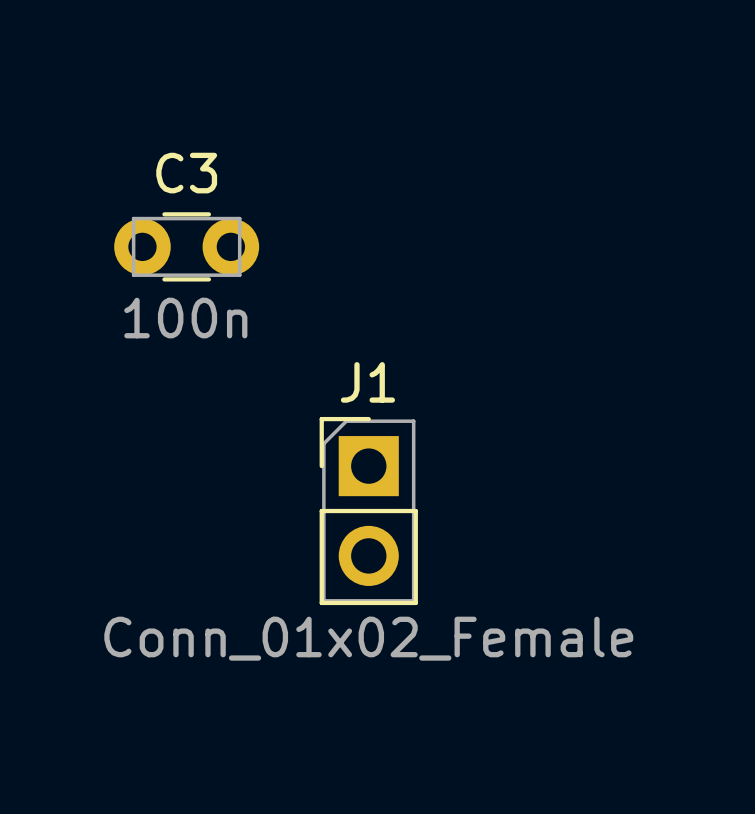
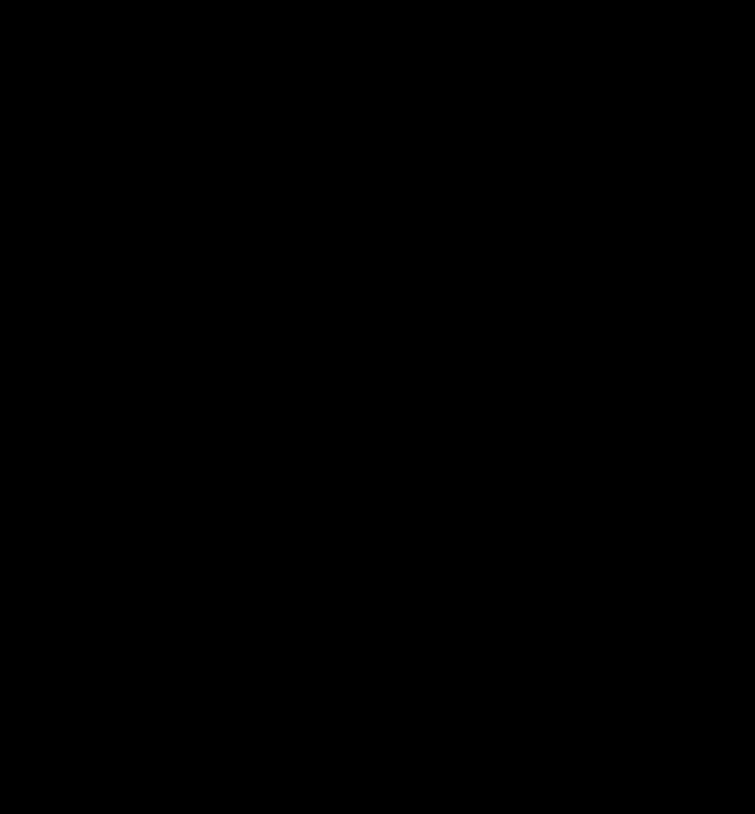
C3: 100n (186, 246) -> none
J1: Conn_01x02_Female (368, 511) -> none

